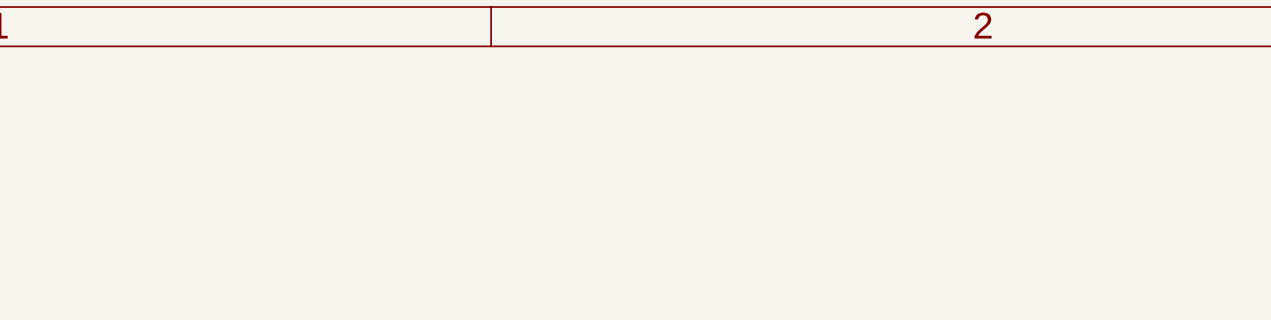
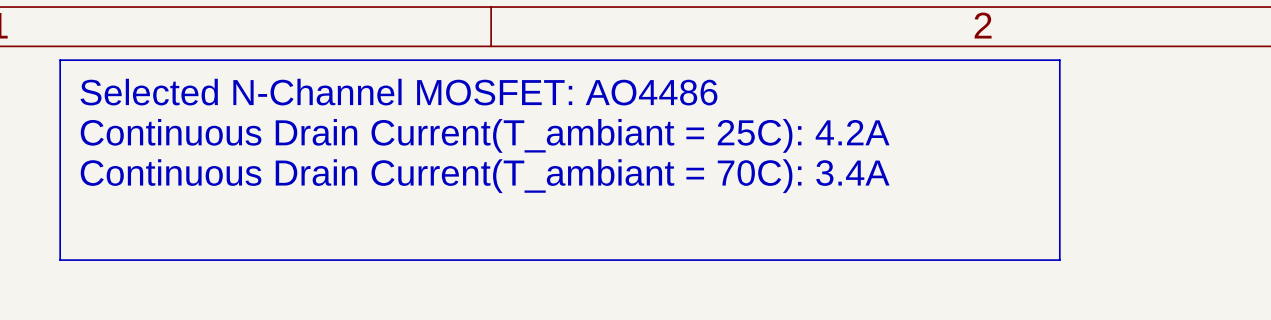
line: none -> (60, 60) (1059, 60) (1059, 260) (60, 260) (60, 60)
text: none -> Selected N-Channel MOSFET: AO4486 (398, 92)
text: none -> Continuous Drain Current(T_ambiant = 25C): 4.2A (485, 135)
text: none -> Continuous Drain Current(T_ambiant = 70C): 3.4A (485, 176)

